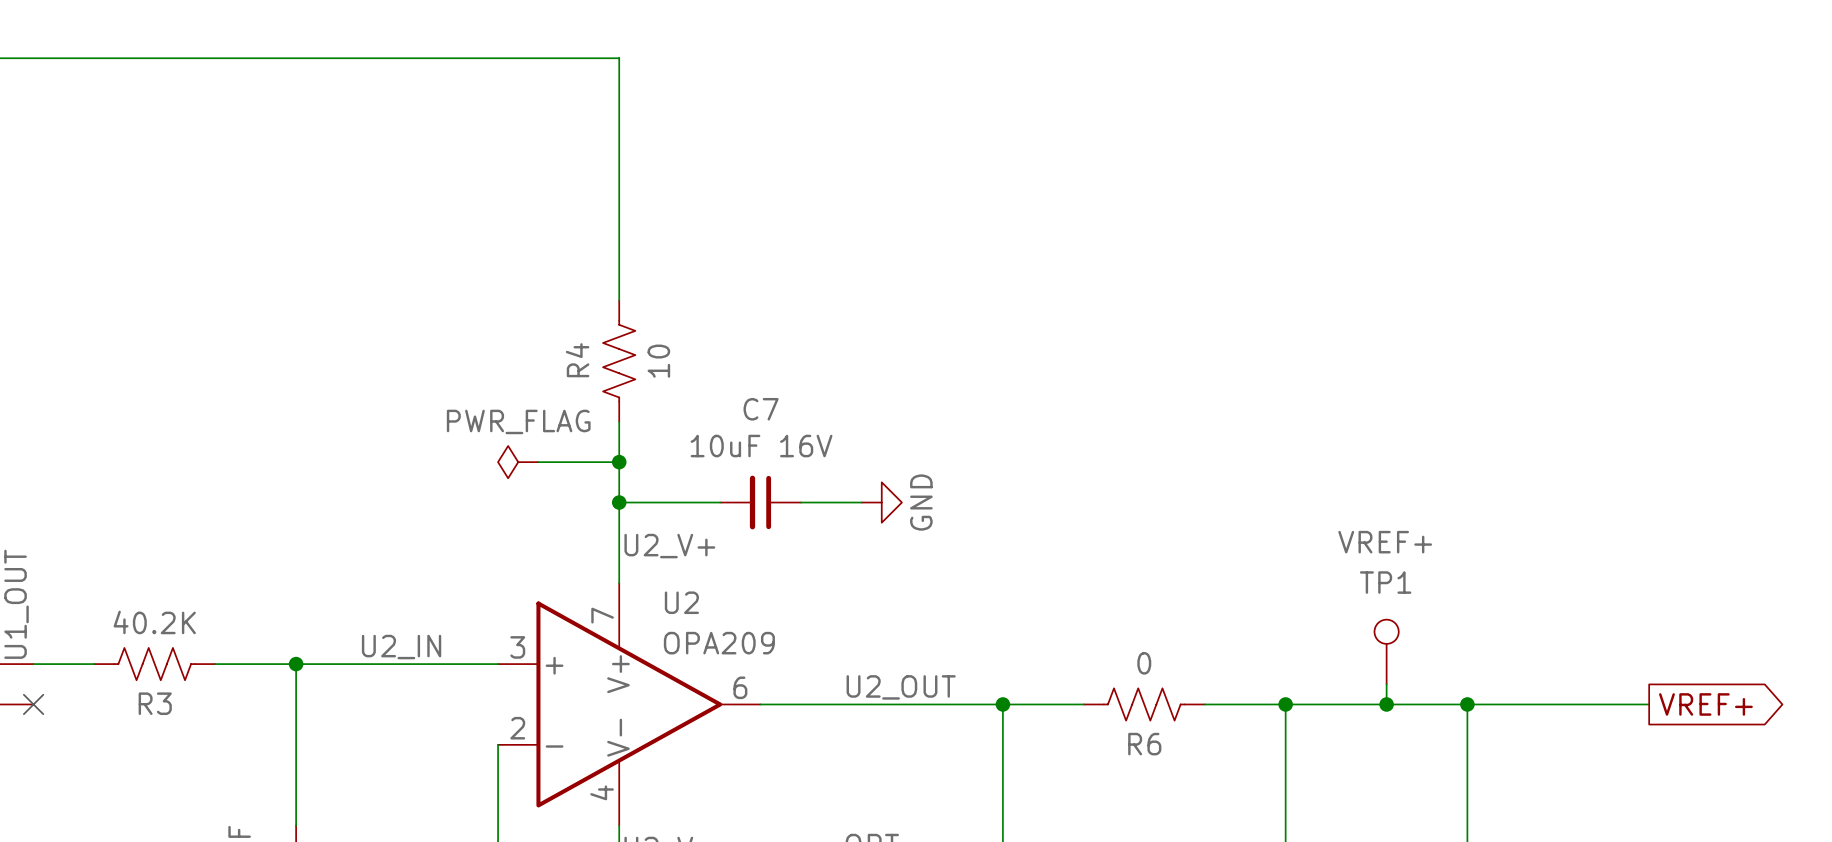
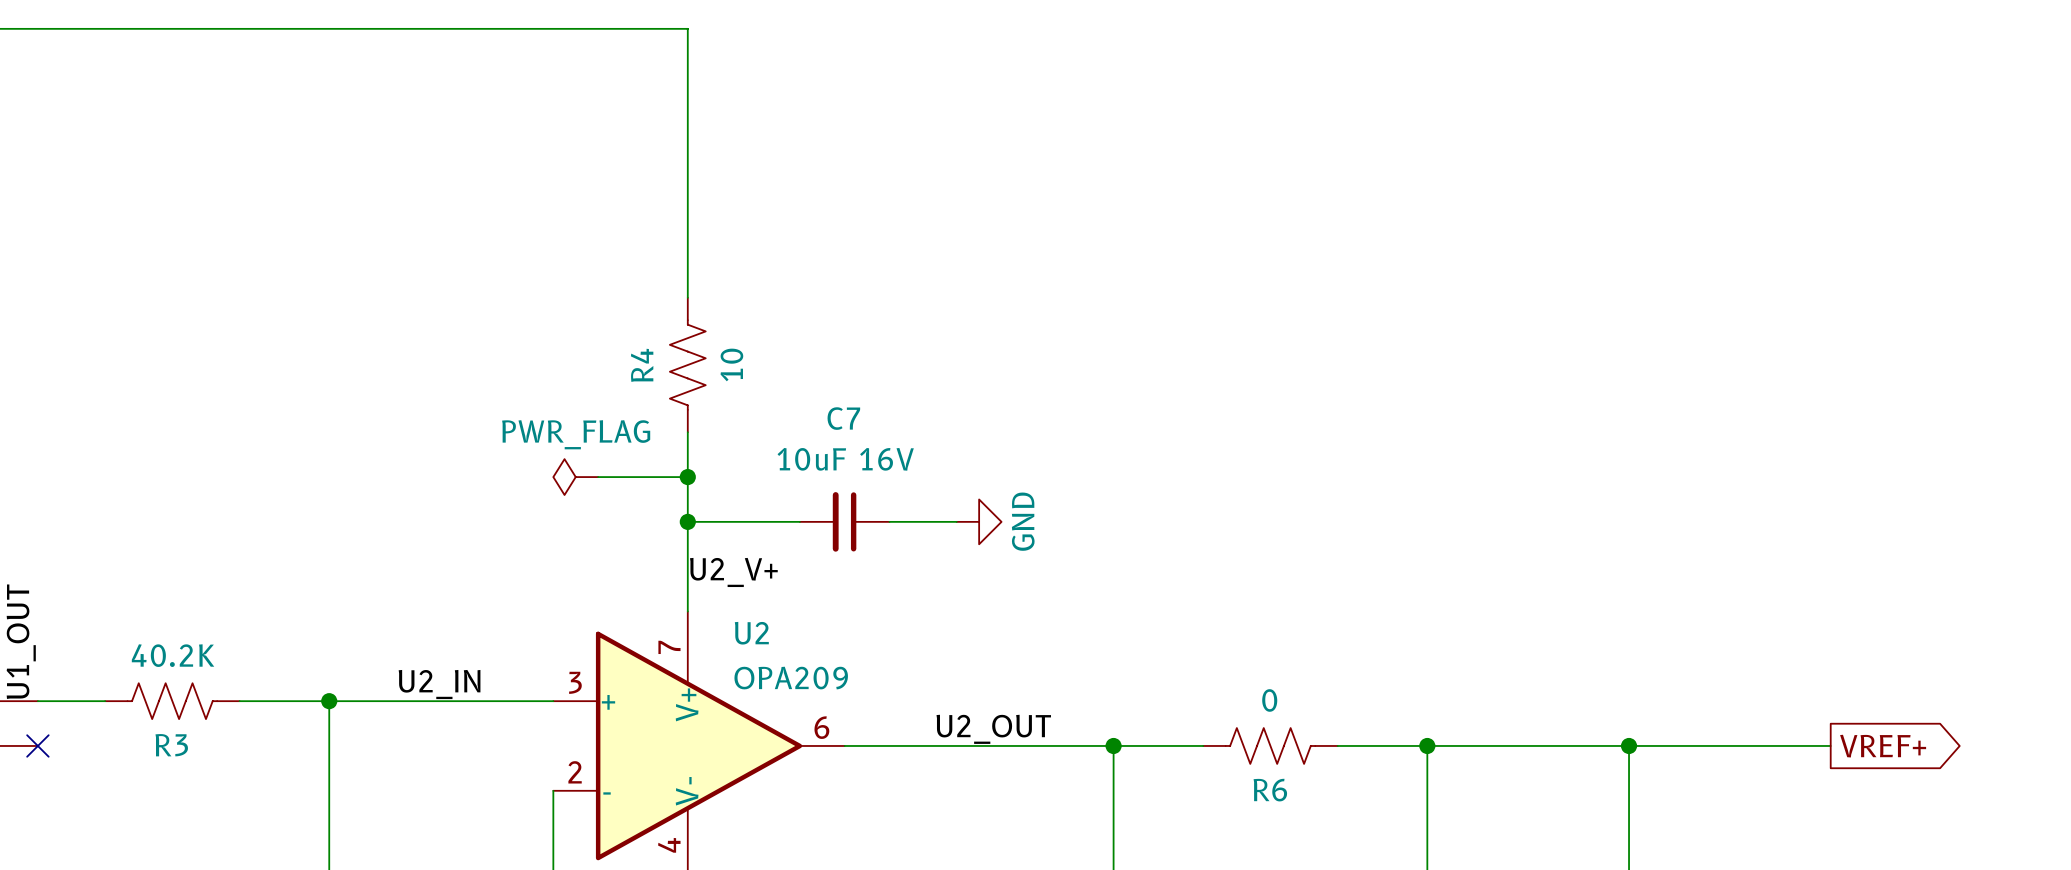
TP1: VREF+ (1386, 651) -> none
wire: (1386, 684) (1386, 704) -> none
junction: (1386, 704) -> none

